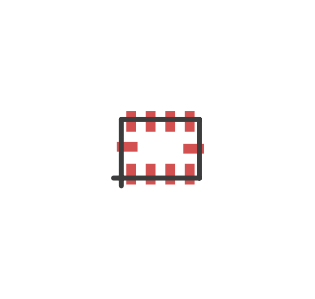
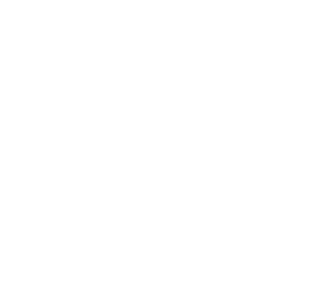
part: (157, 149) -> none

